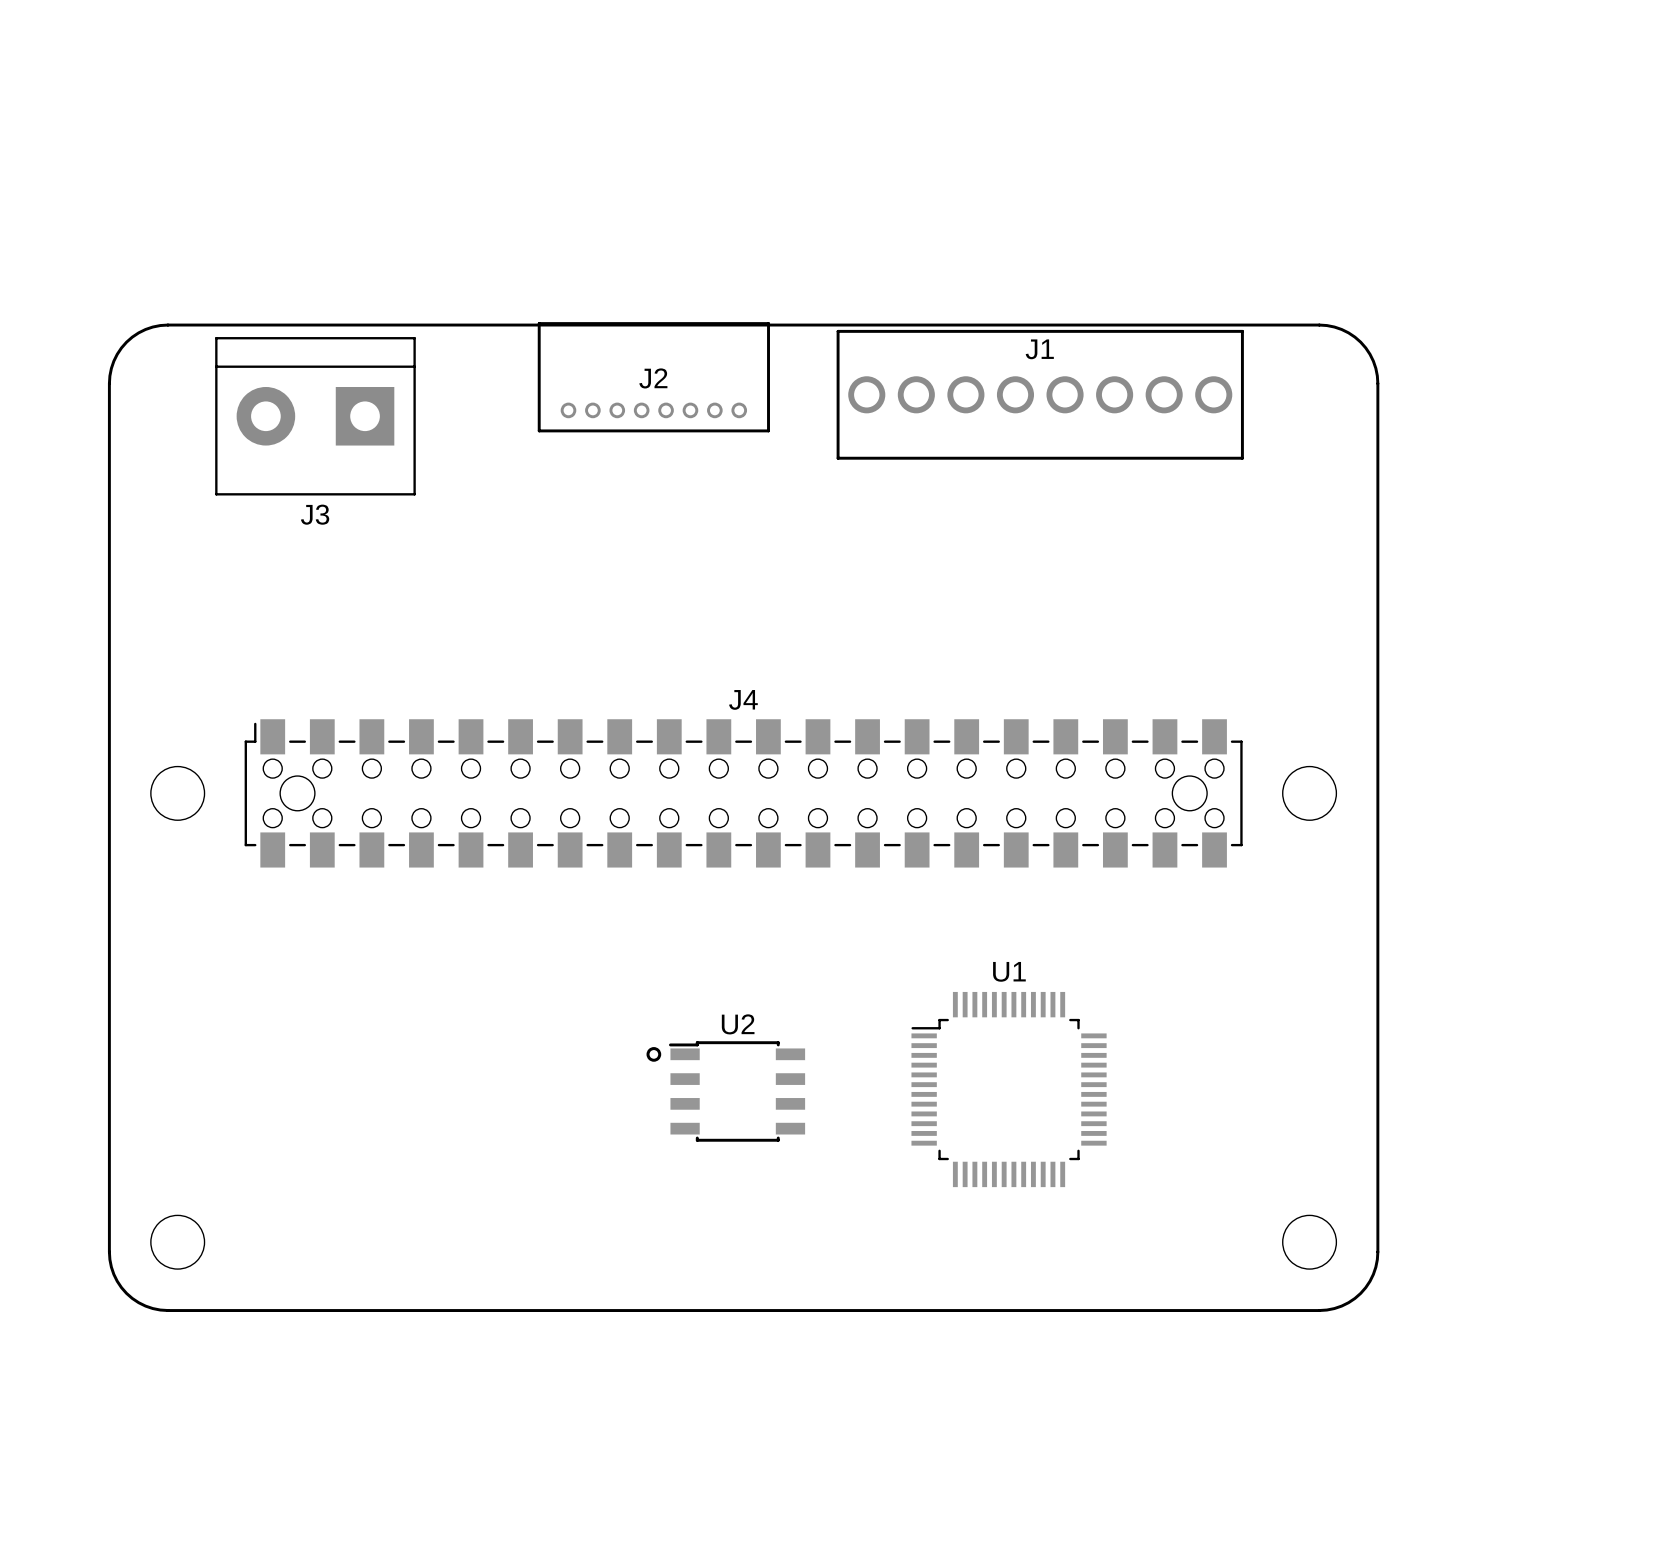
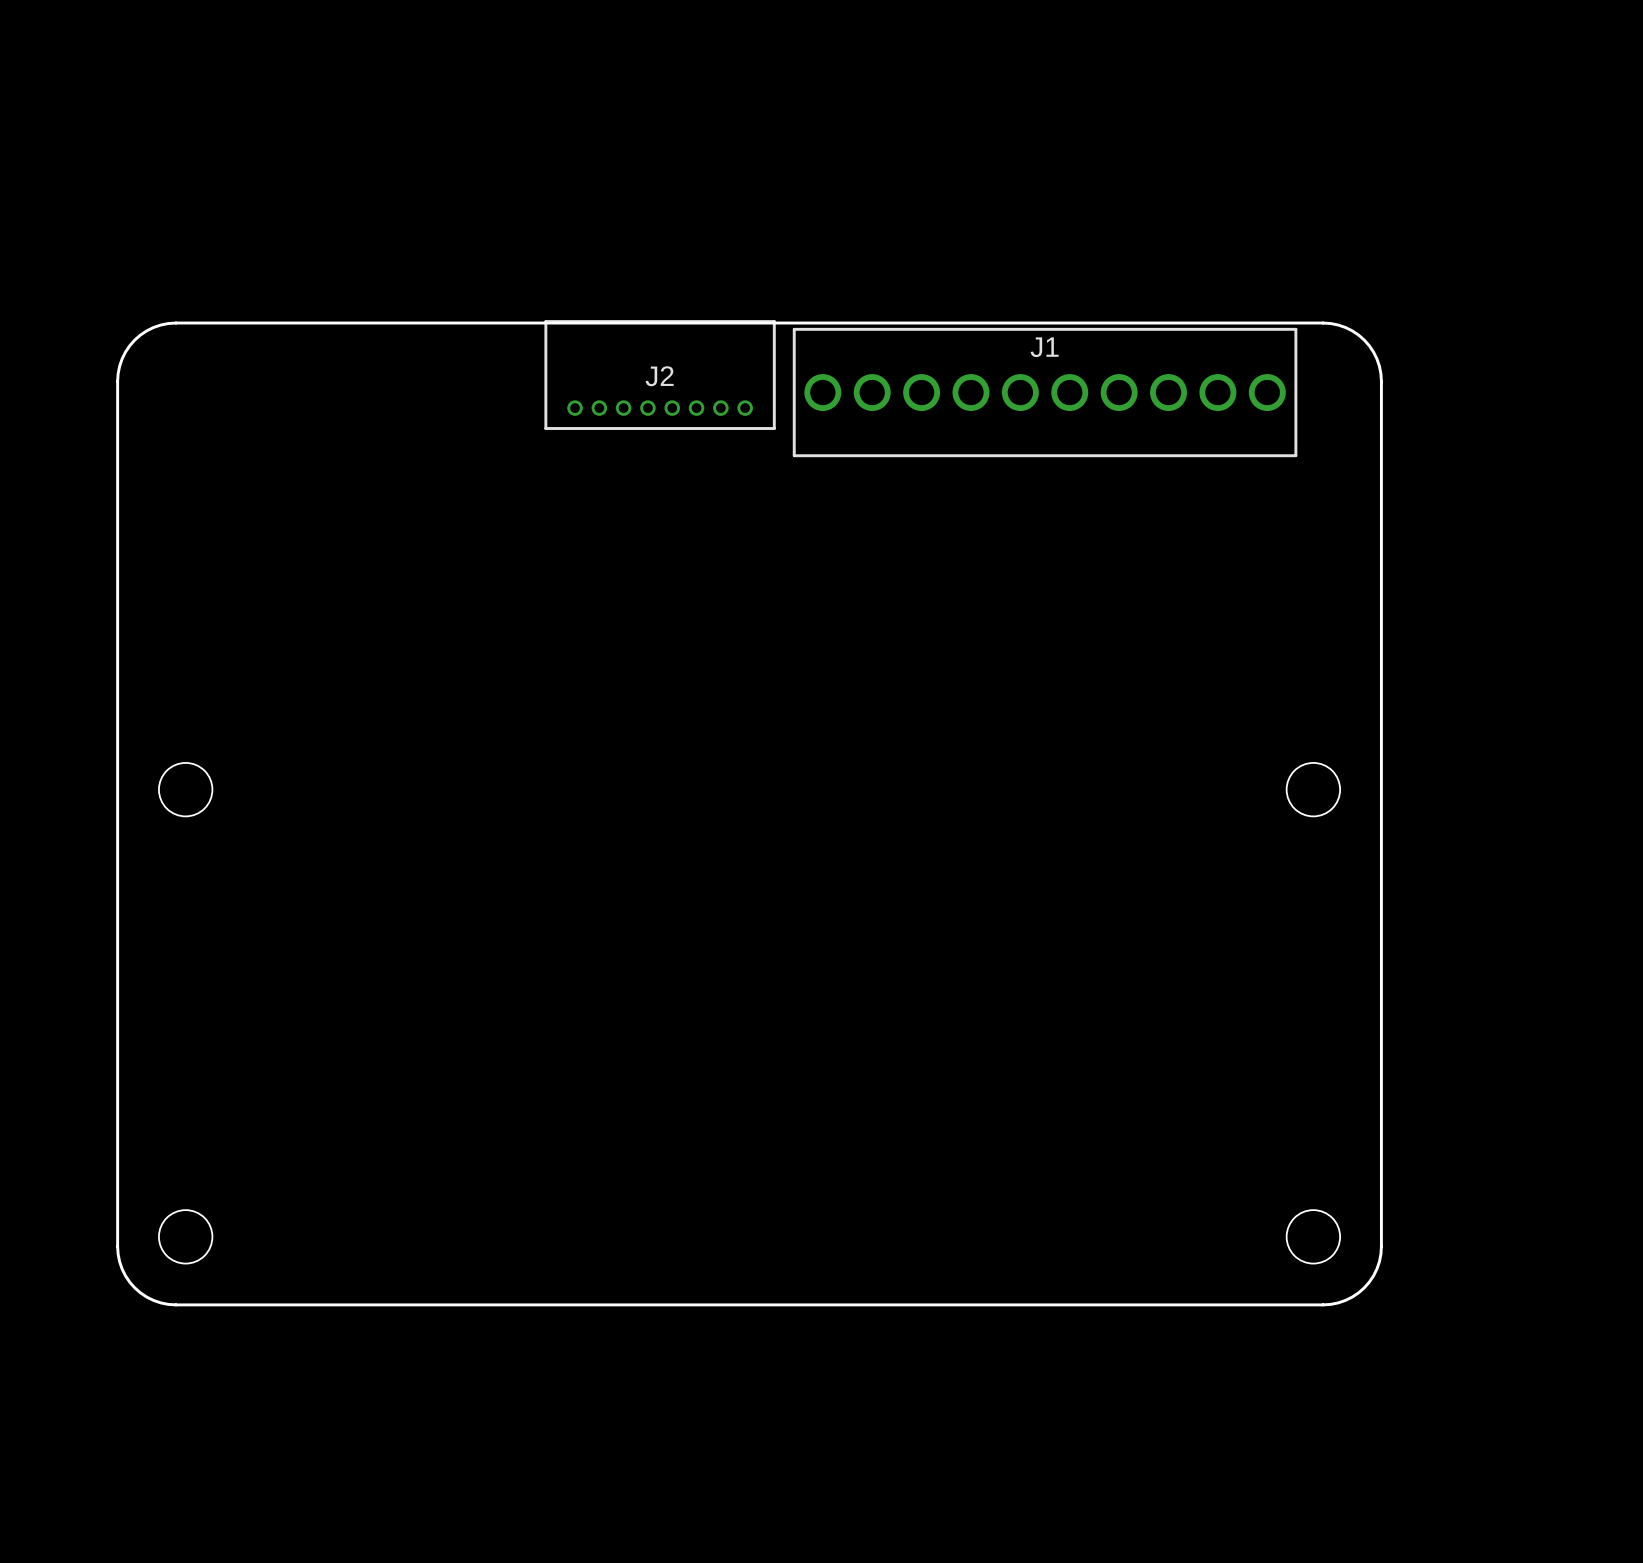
J1 footprint: [836, 329, 1244, 460] -> [792, 327, 1298, 458]
J3: (315, 416) -> none
J4: (743, 793) -> none
U1: (1009, 1089) -> none
U2: (725, 1091) -> none

